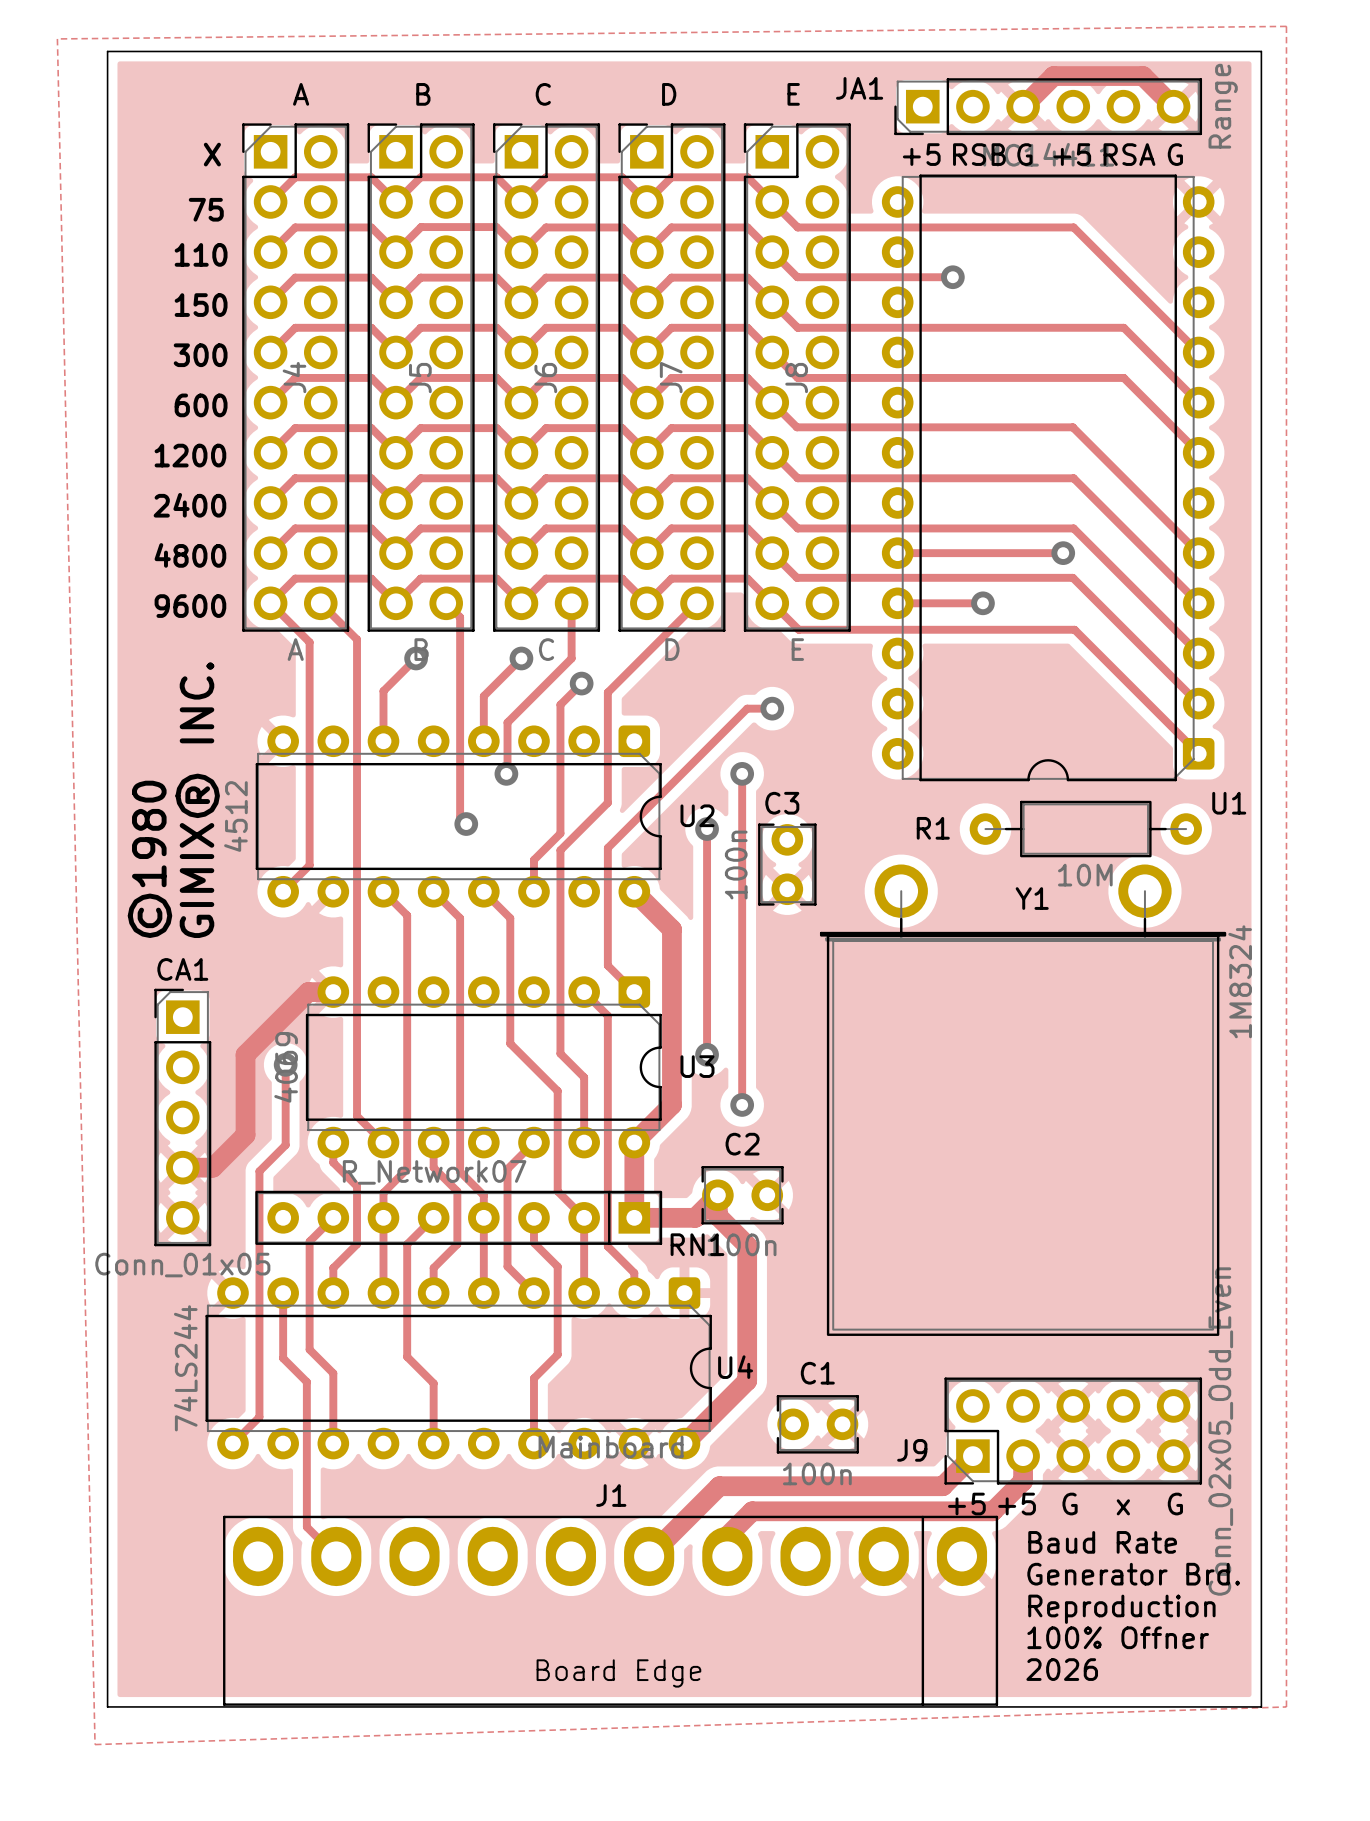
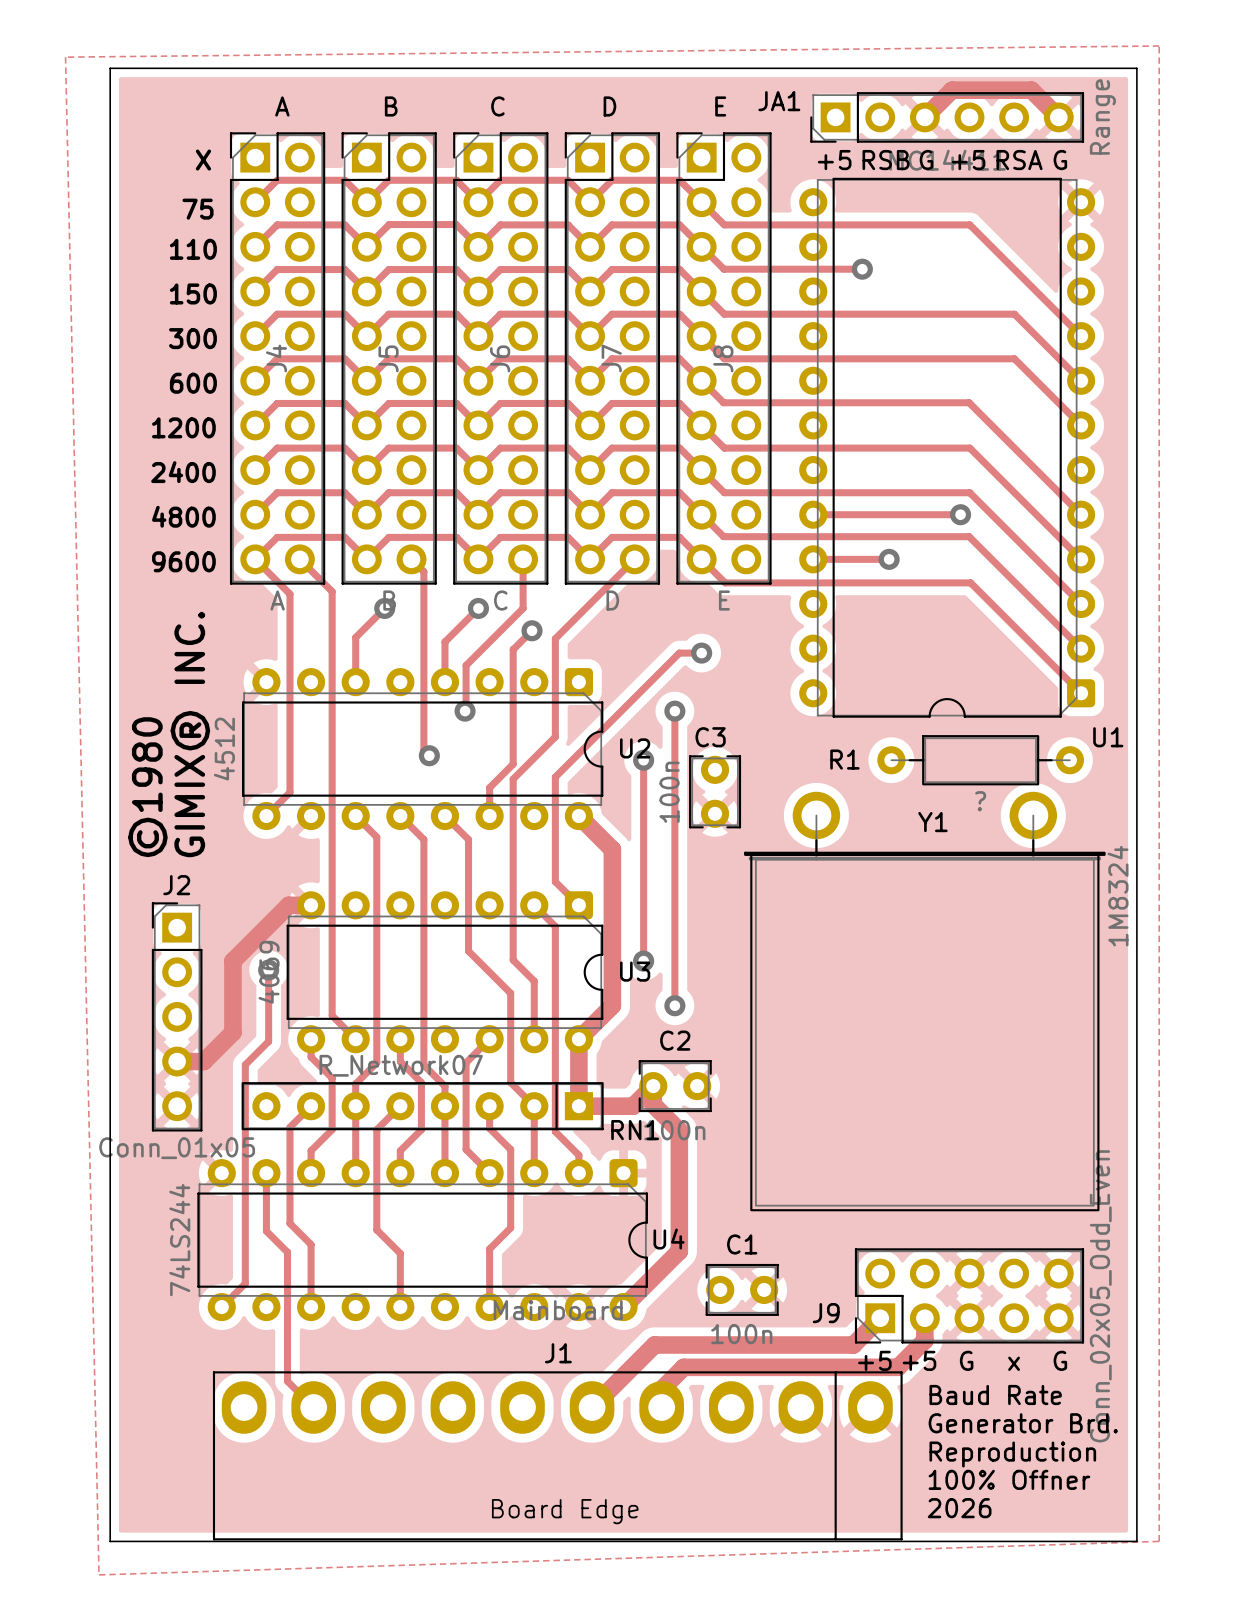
R1 value: 10M (1085, 875) -> ? (980, 801)
CA1 name: CA1 (182, 969) -> J2 (176, 885)

